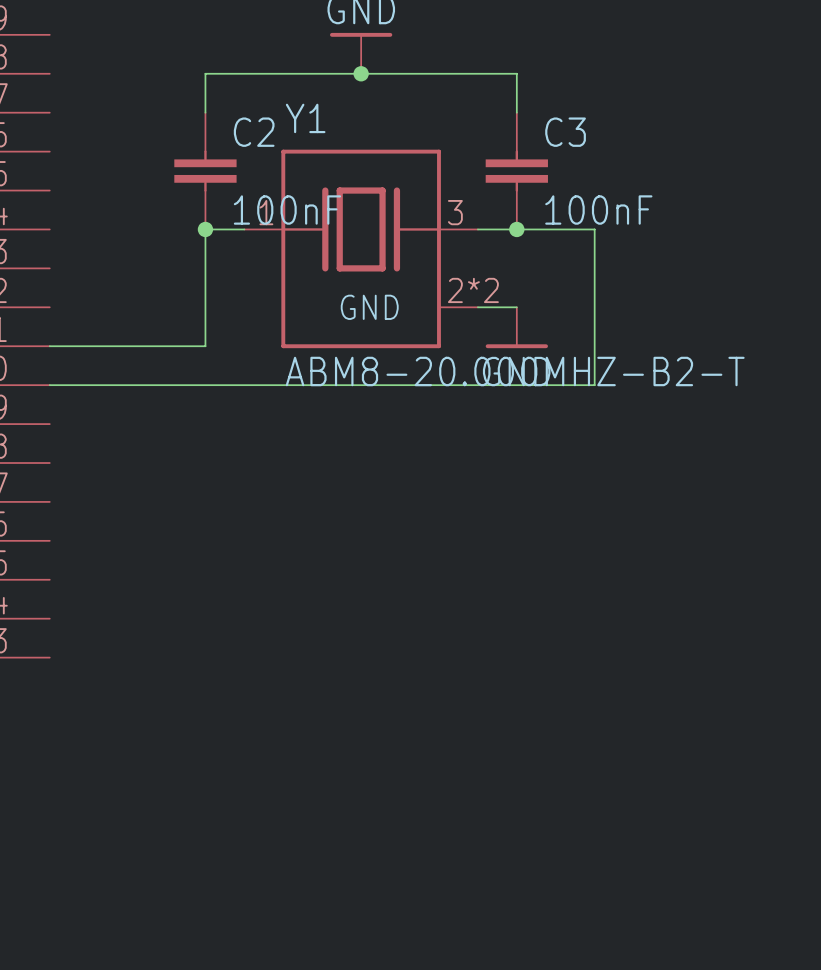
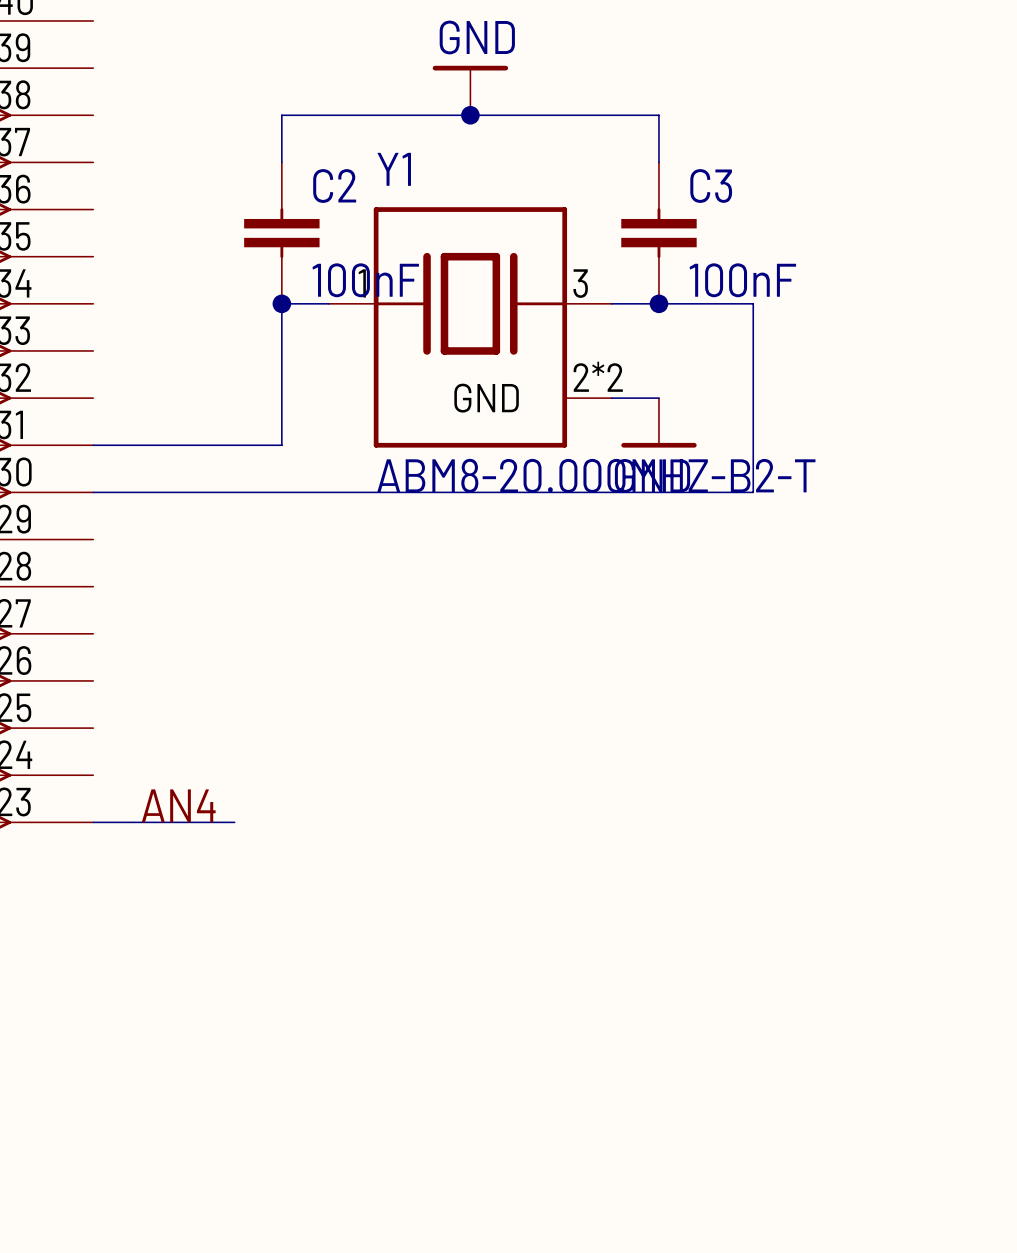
label: none -> AN4 (178, 805)
wire: none -> (93, 822) (234, 822)

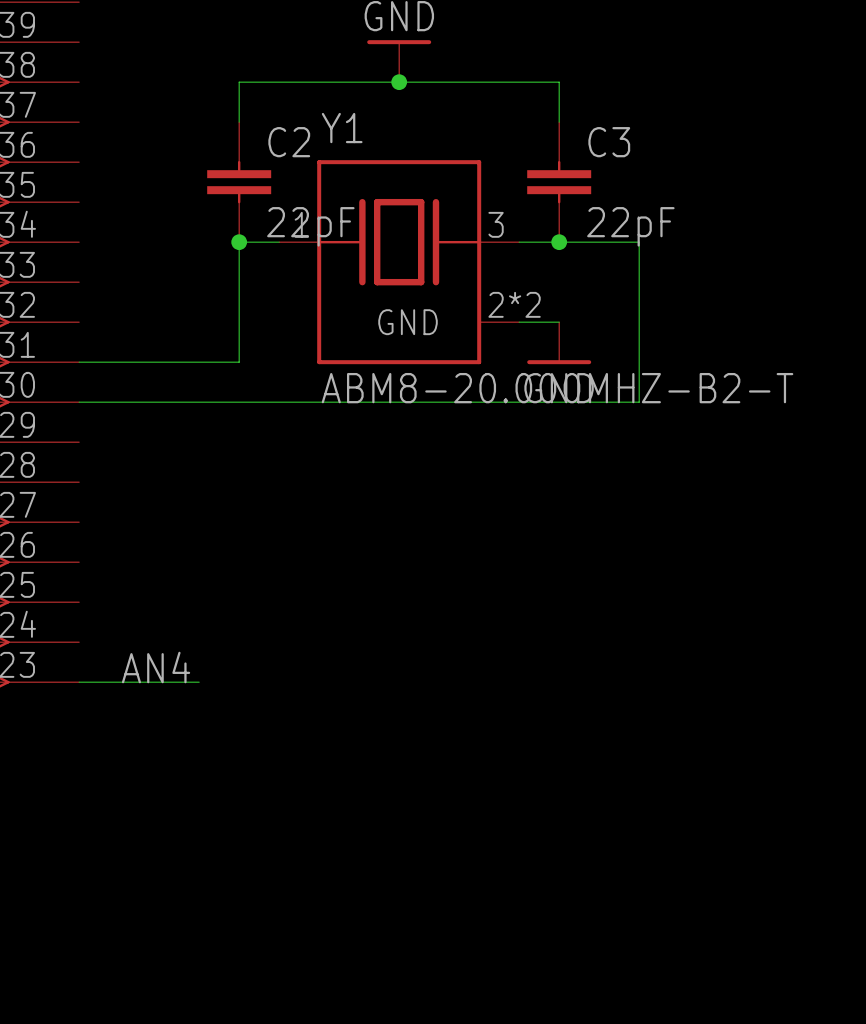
C2 value: 100nF (365, 280) -> 22pF (310, 226)
C3 value: 100nF (742, 280) -> 22pF (630, 226)

